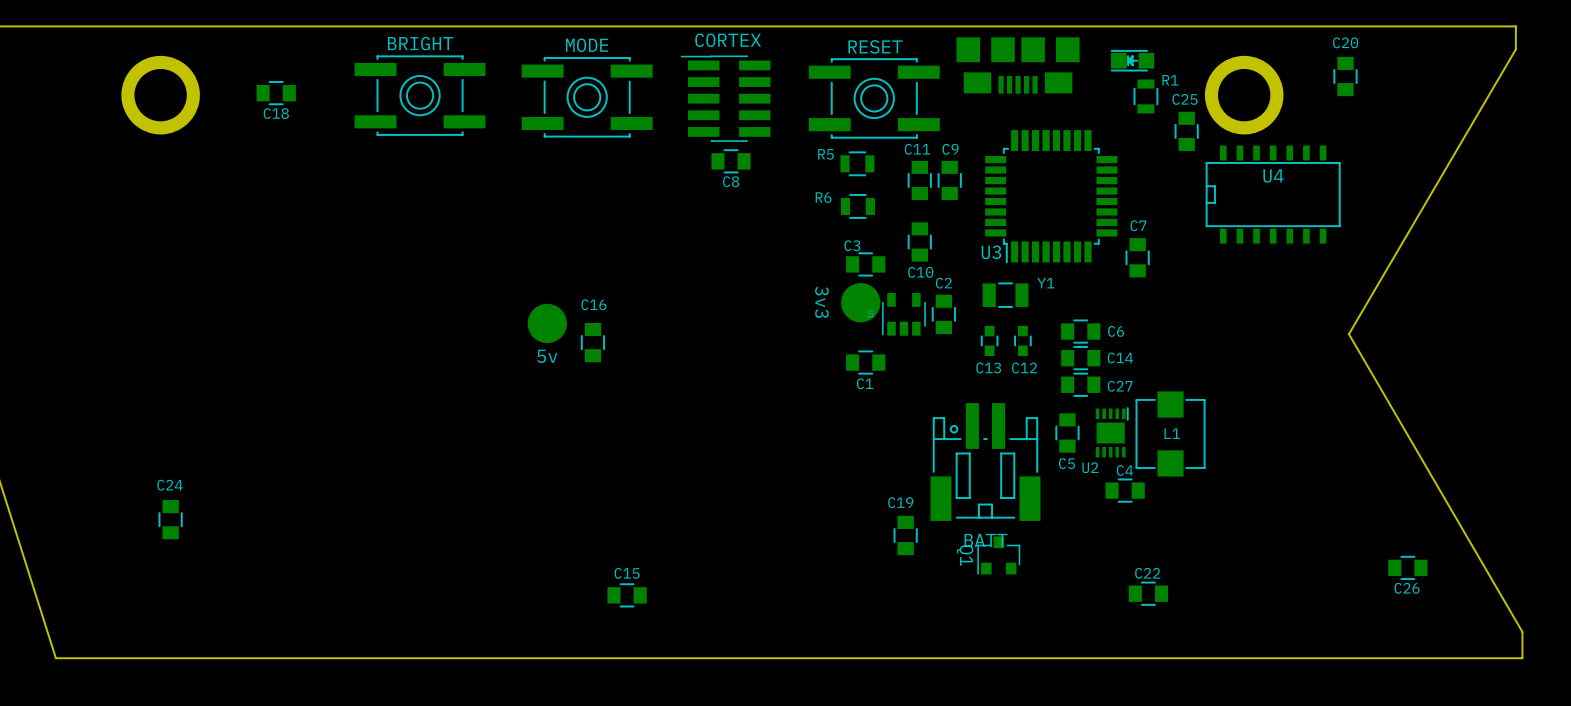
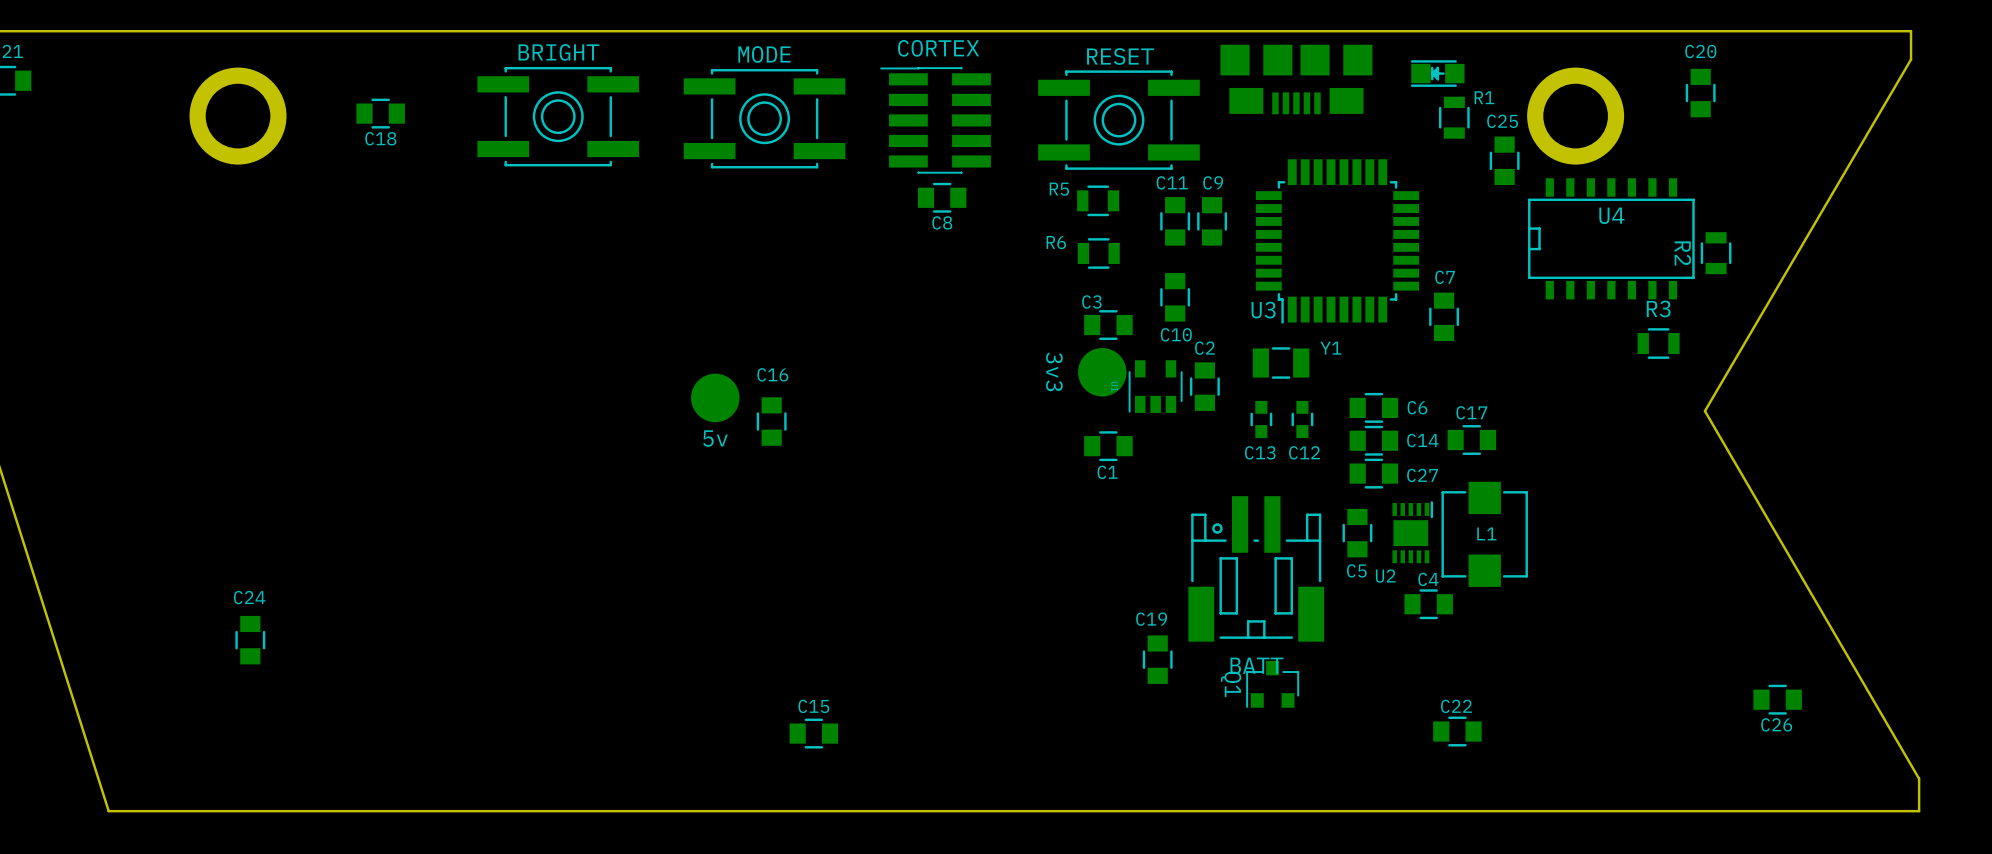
R2: none -> (1716, 253)
R3: none -> (1658, 343)
C17: none -> (1471, 440)

